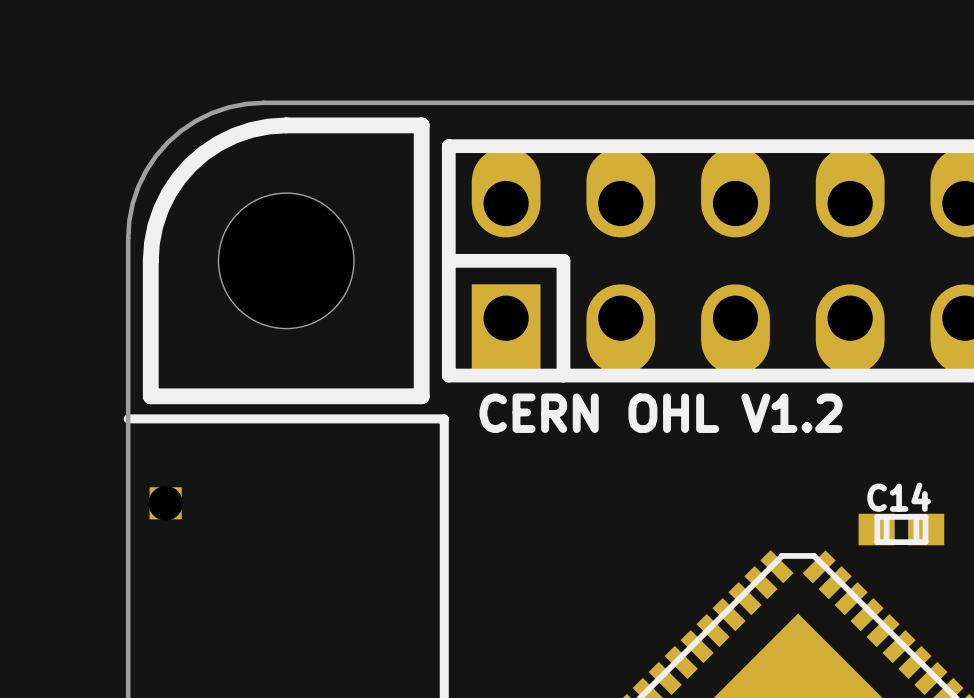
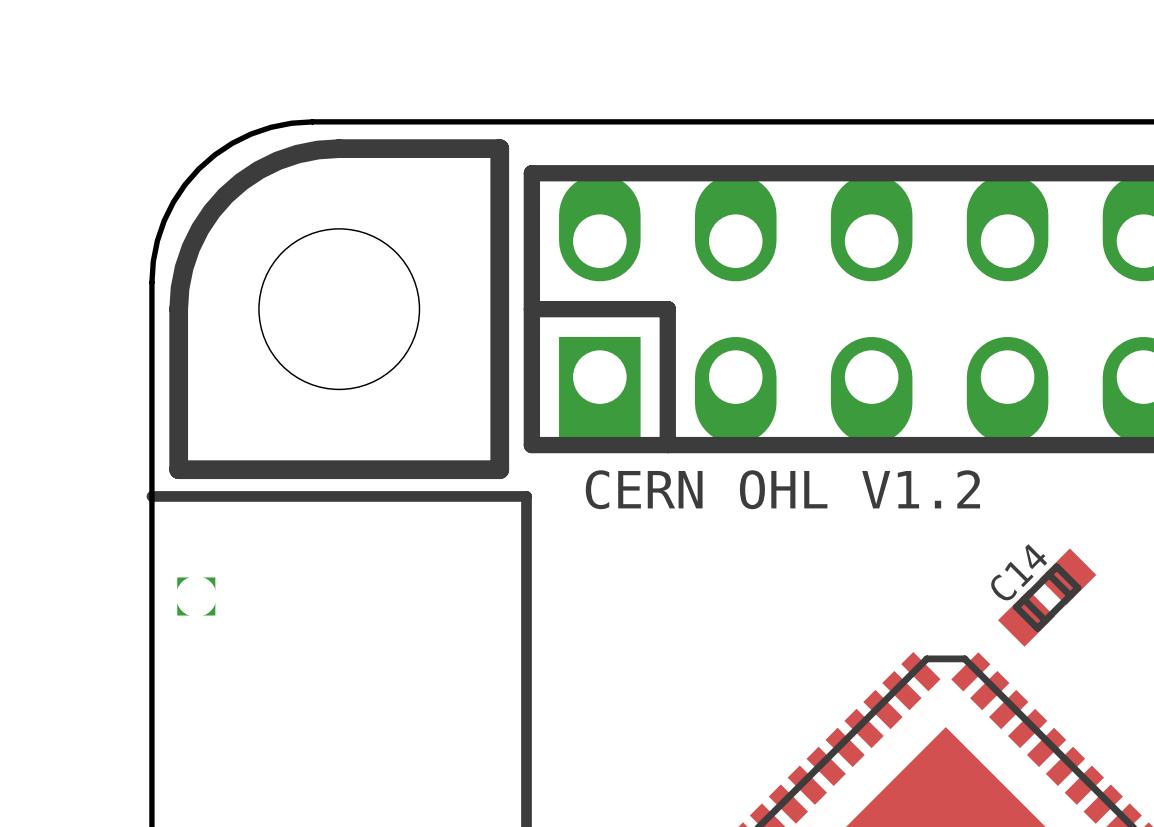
C14 rotation: 0° (901, 529) -> 45° counterclockwise (1047, 597)

